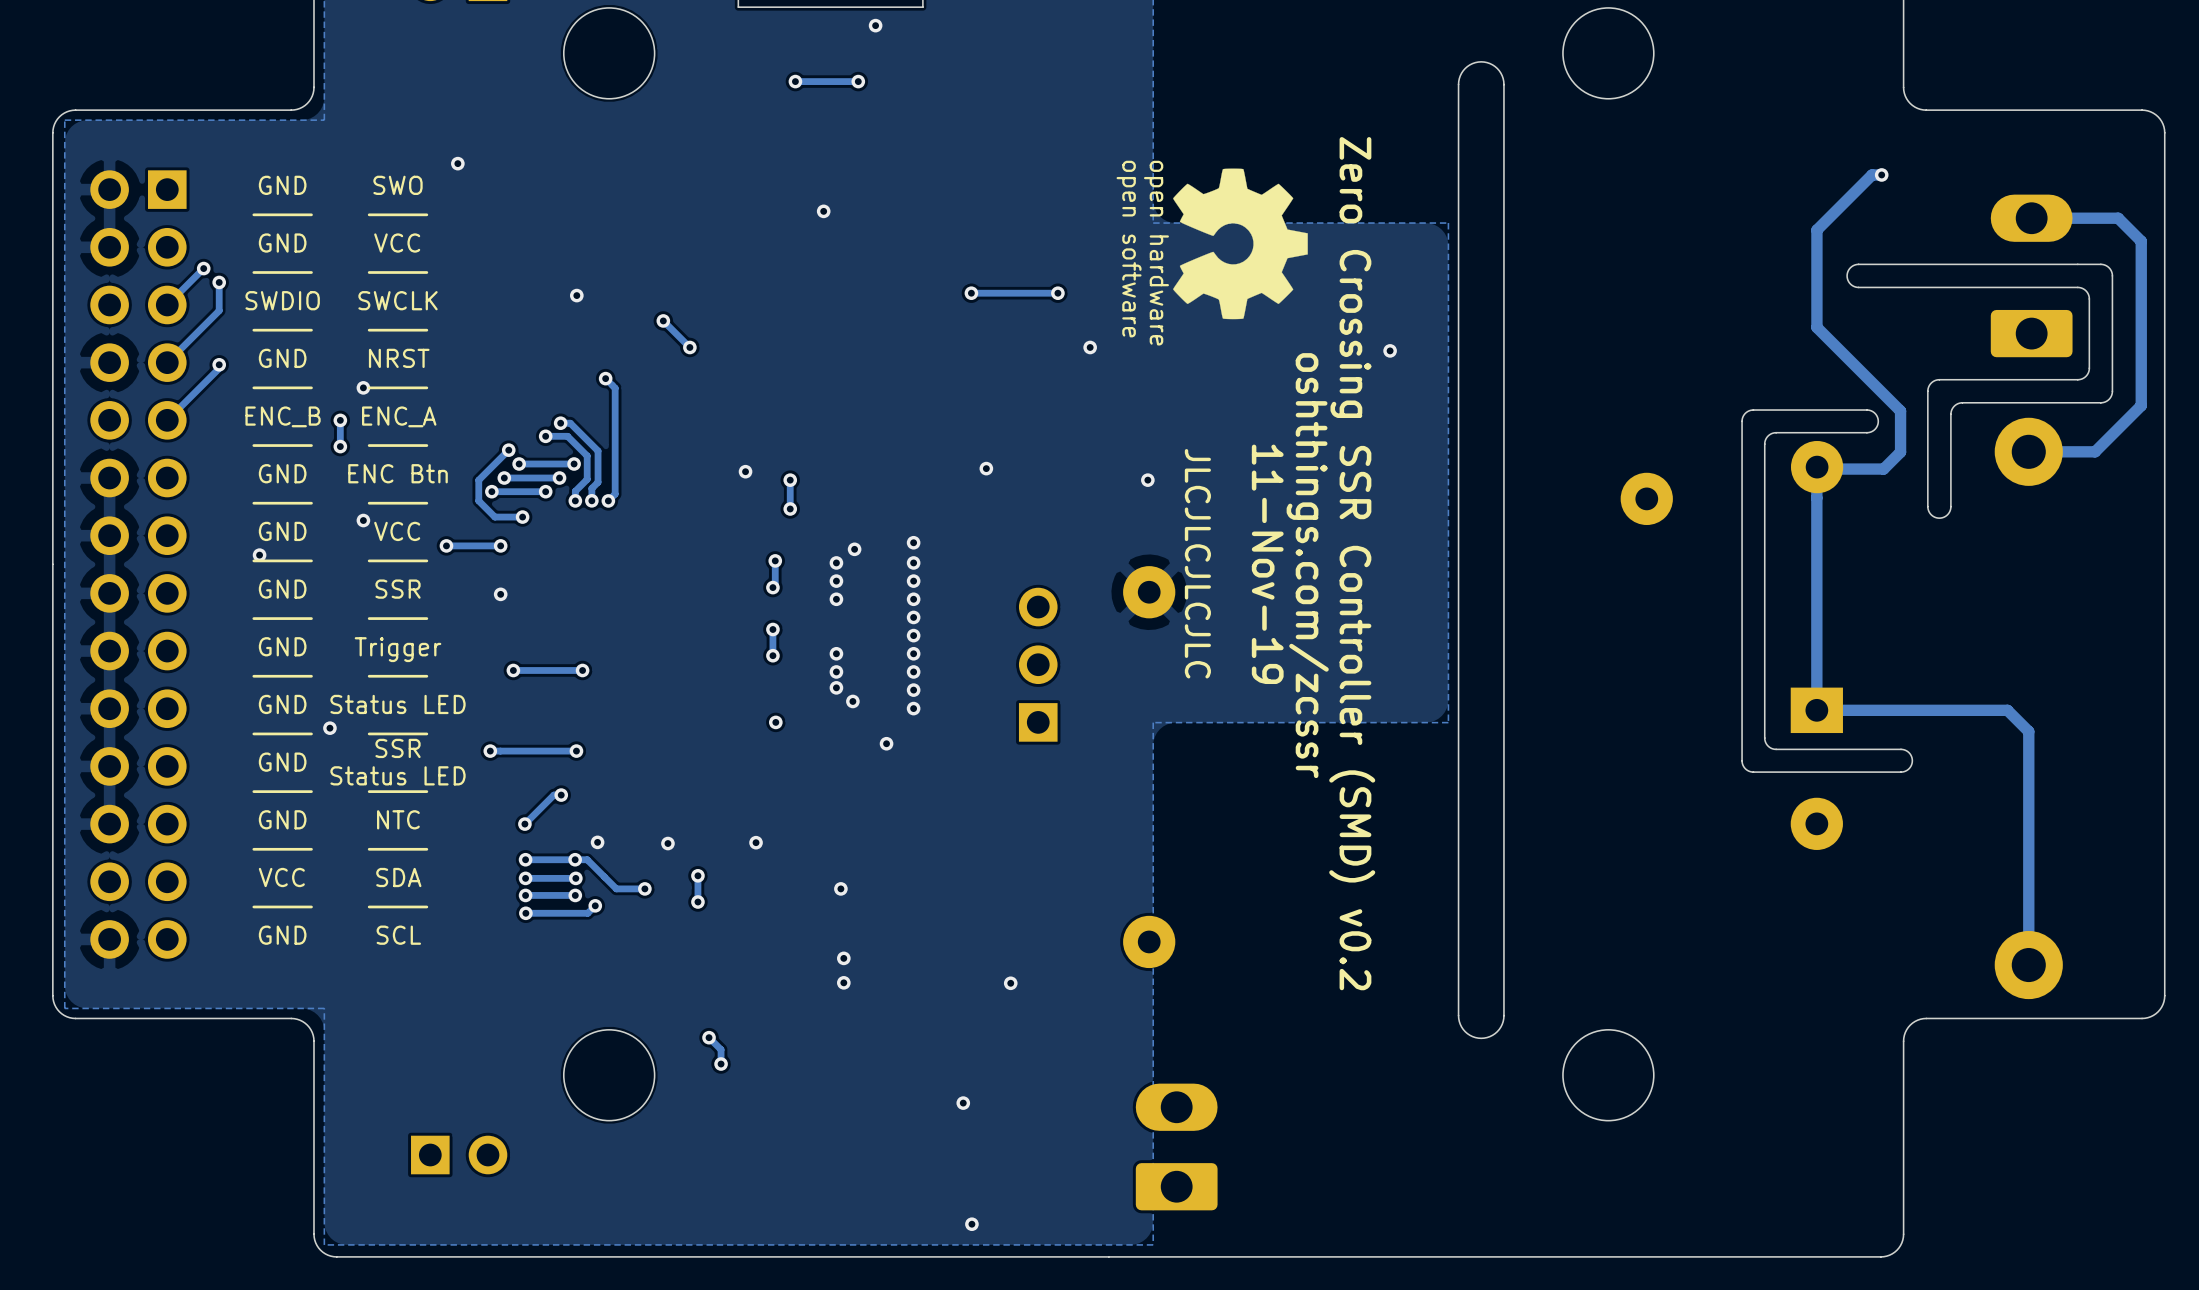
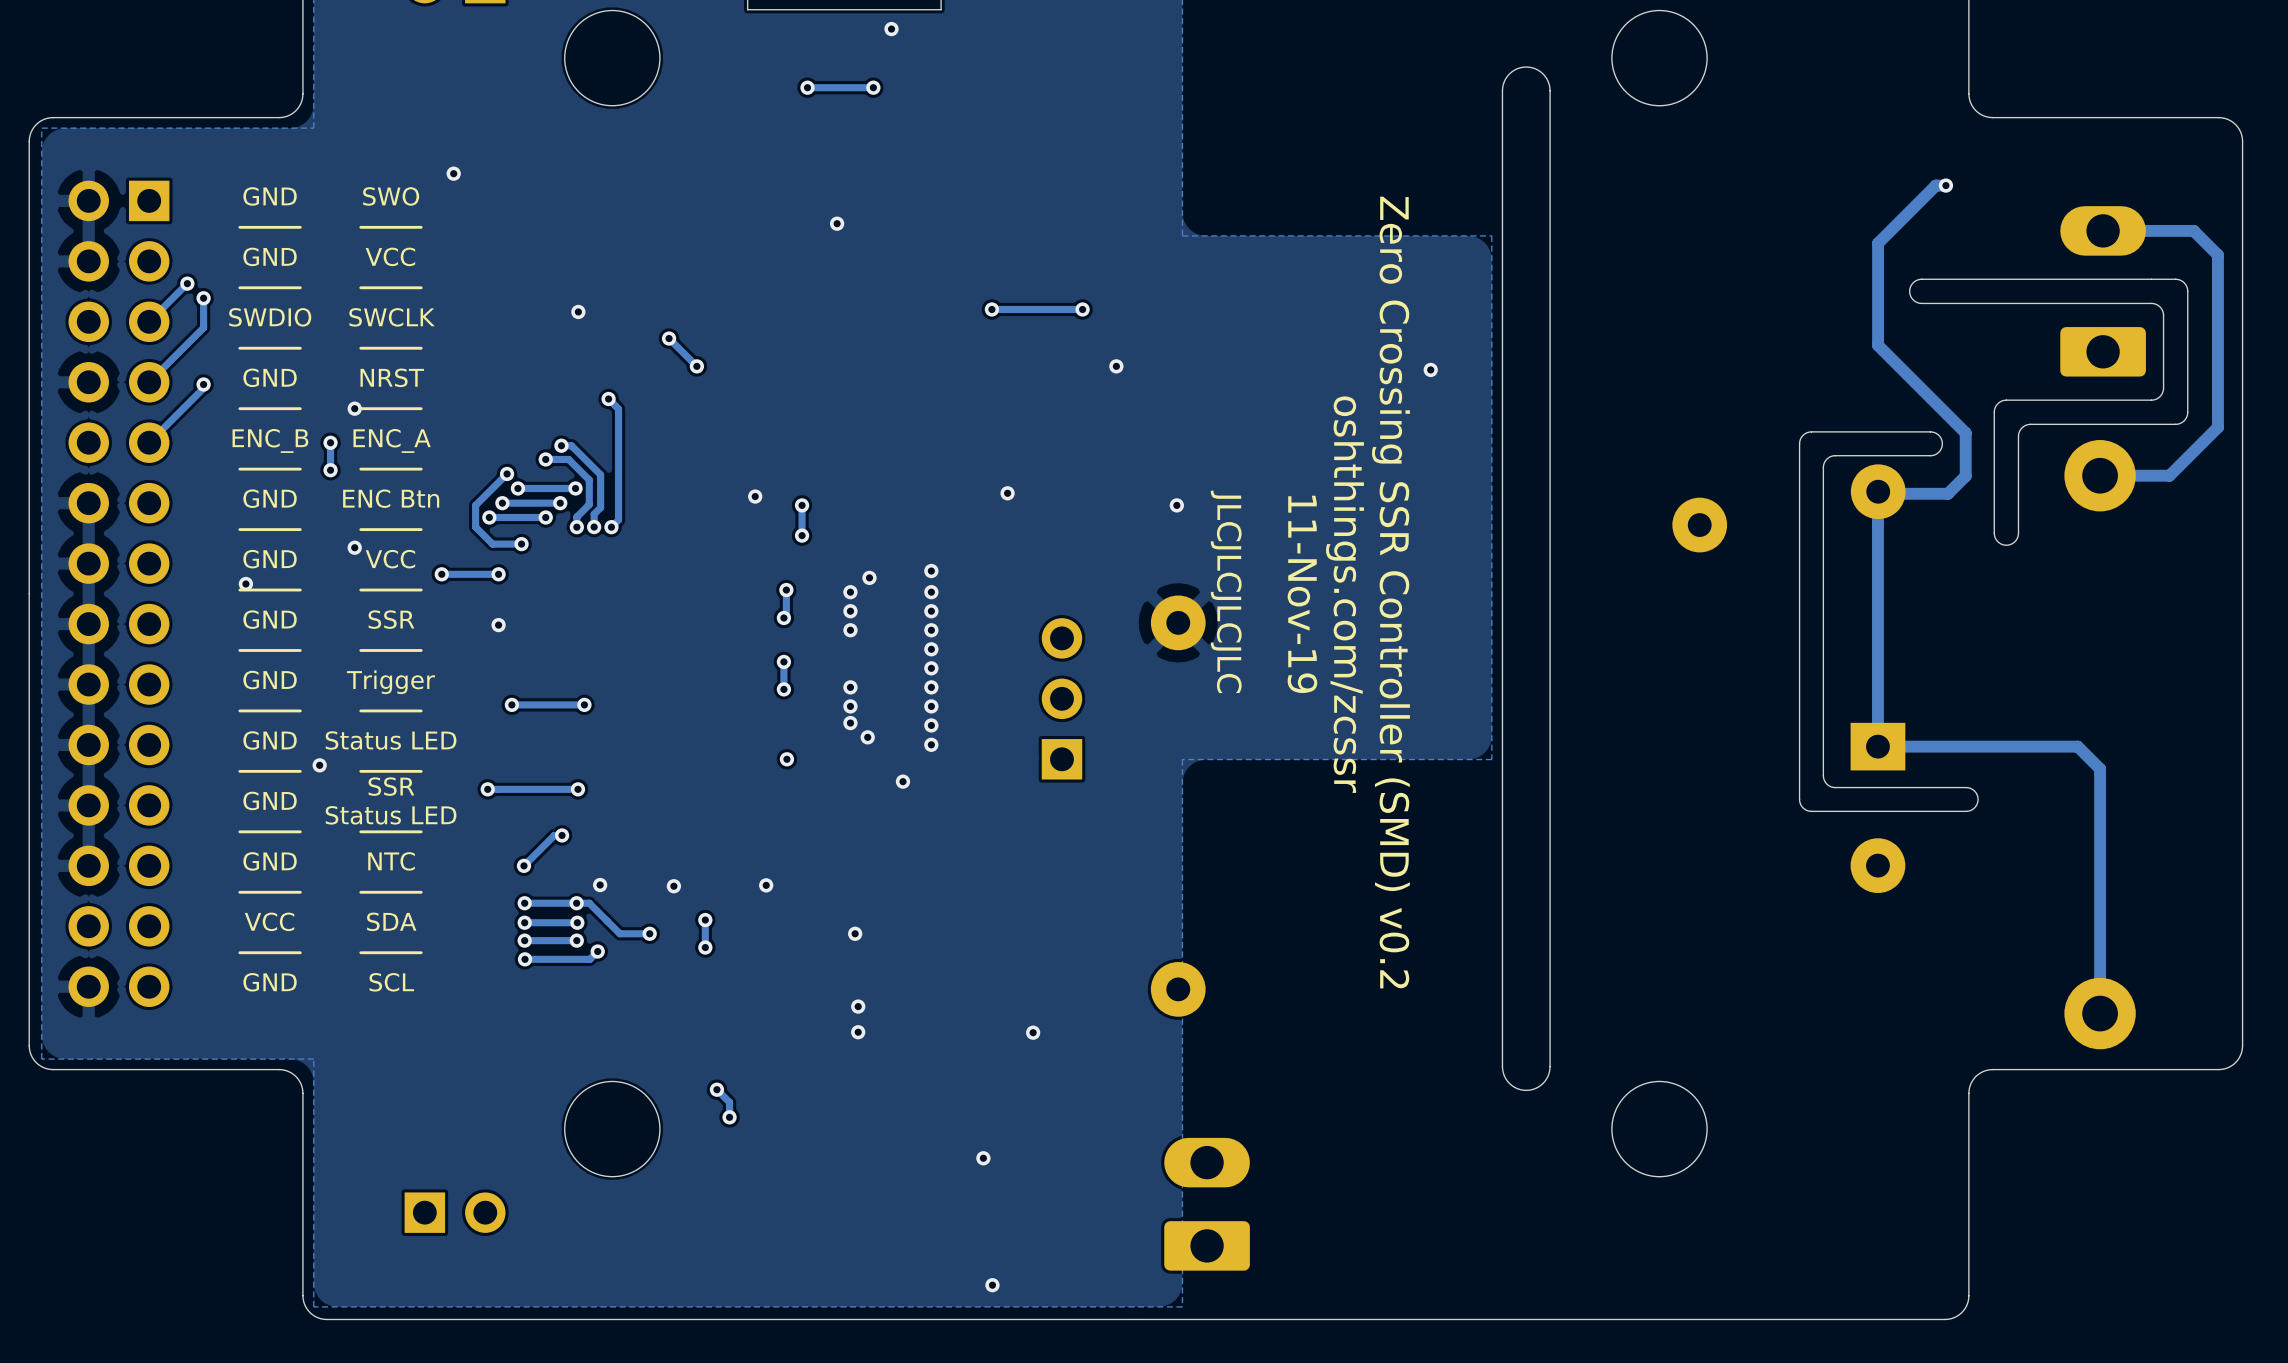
drawing: [1173, 168, 1308, 320] -> none
text: open software (1129, 249) -> none
text: open hardware (1156, 253) -> none

